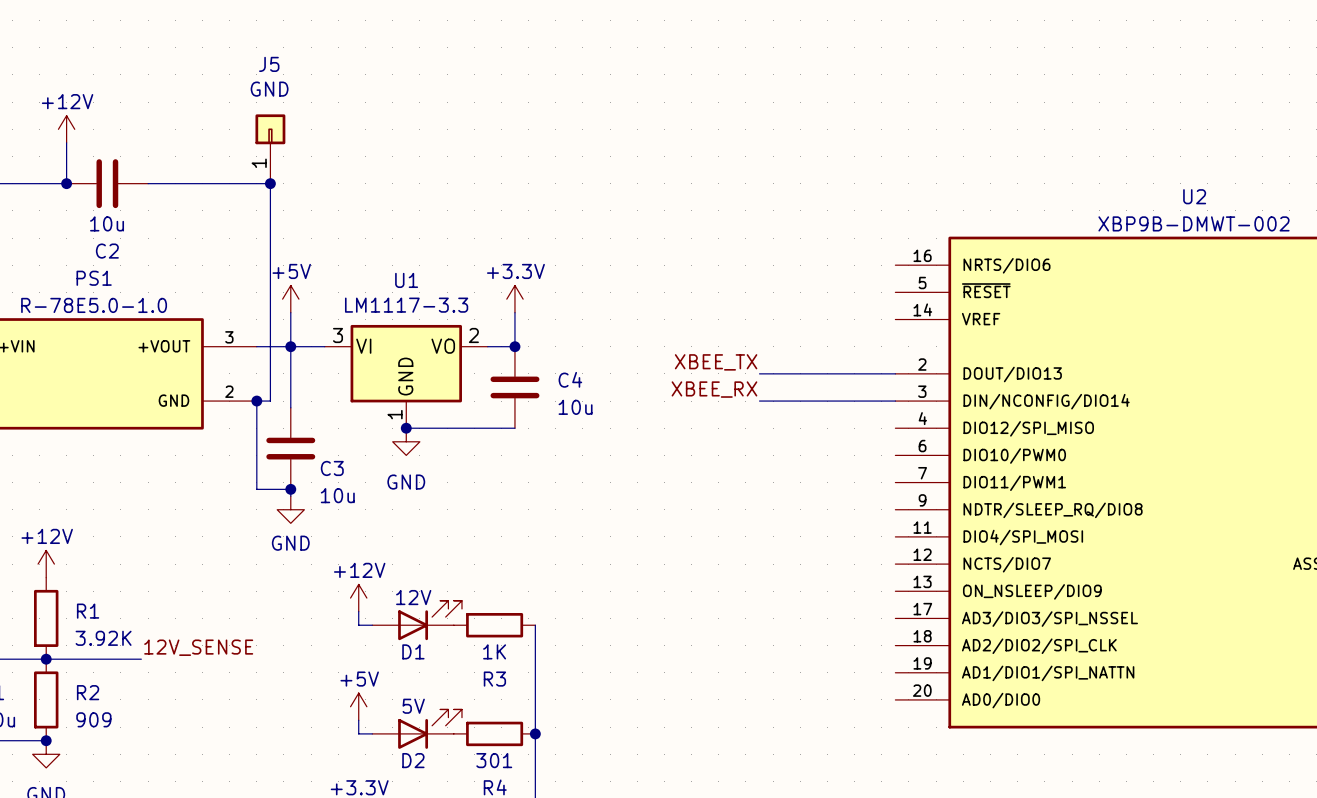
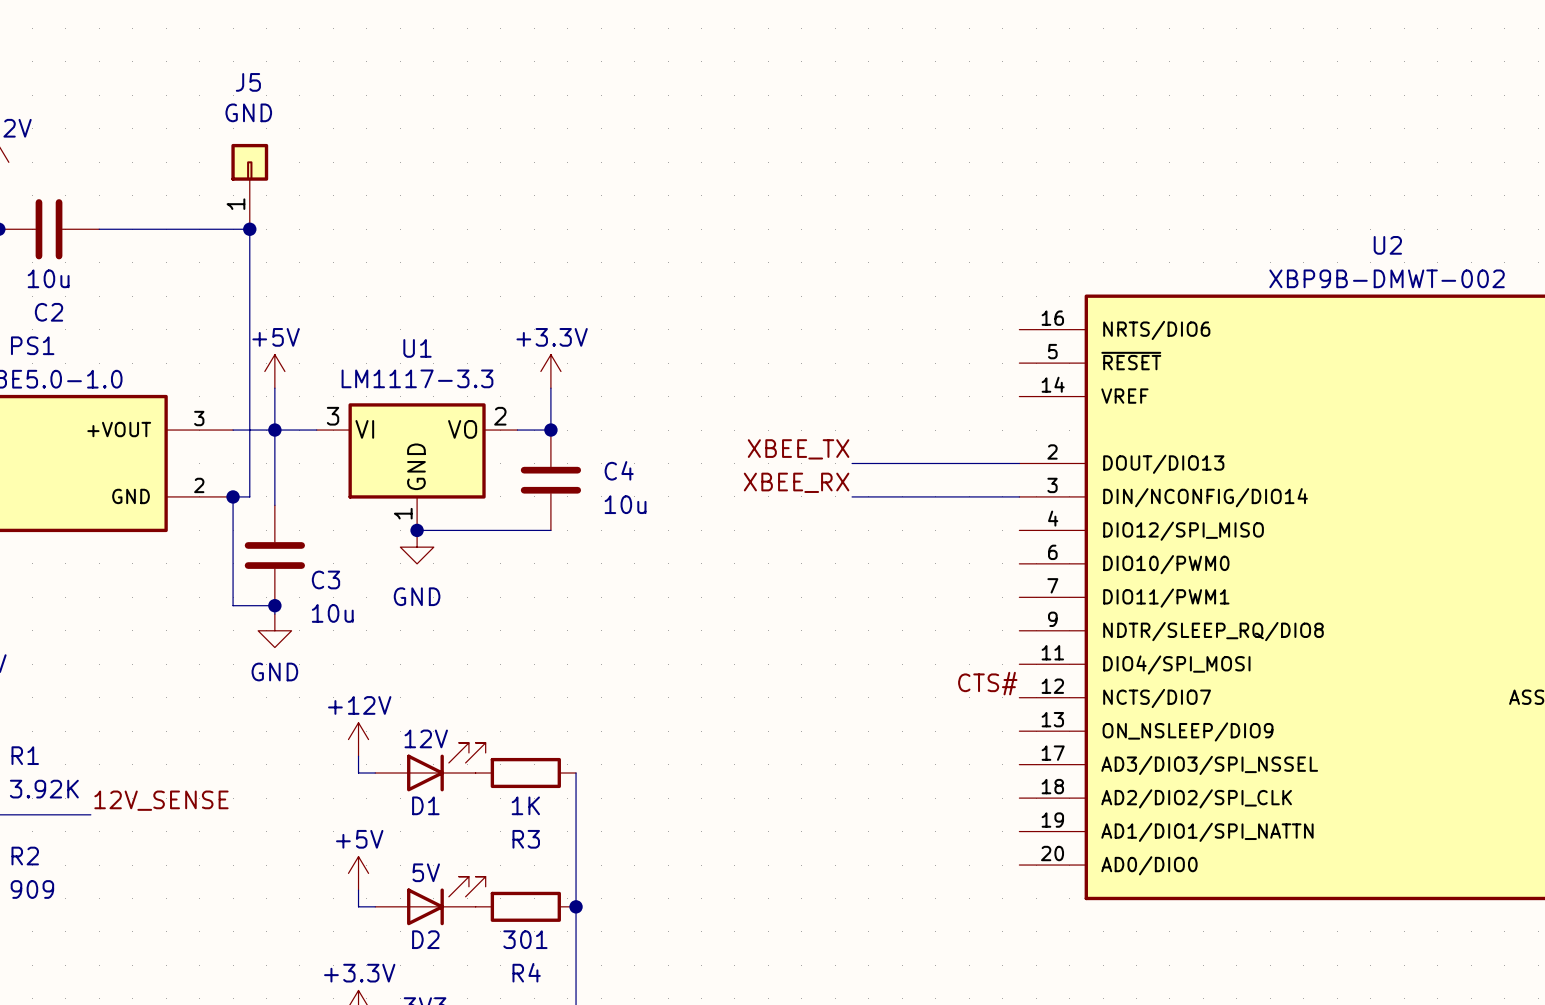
label: none -> CTS# (987, 683)

